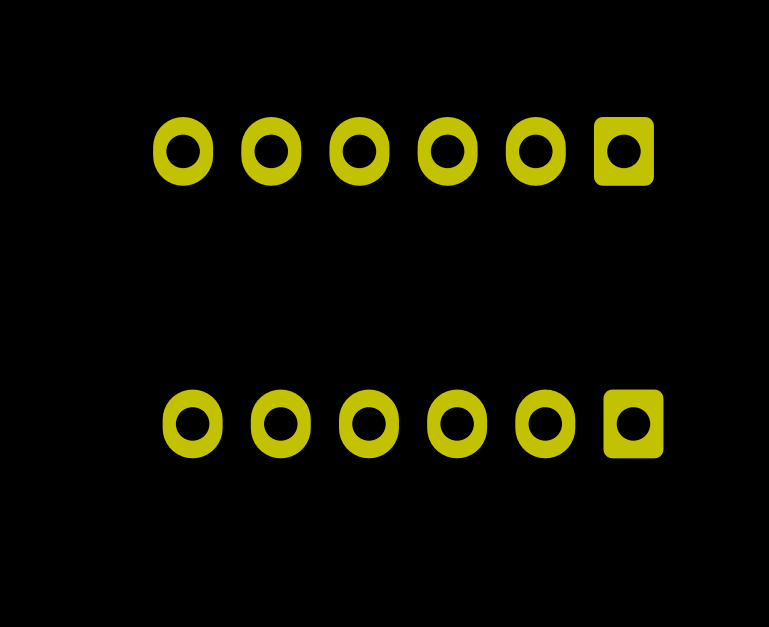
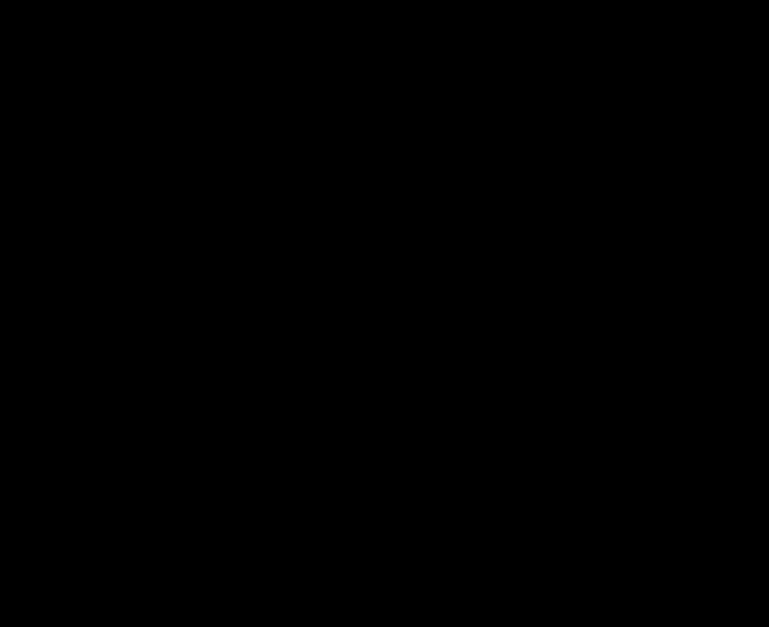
part: (403, 151) -> none
part: (413, 423) -> none

